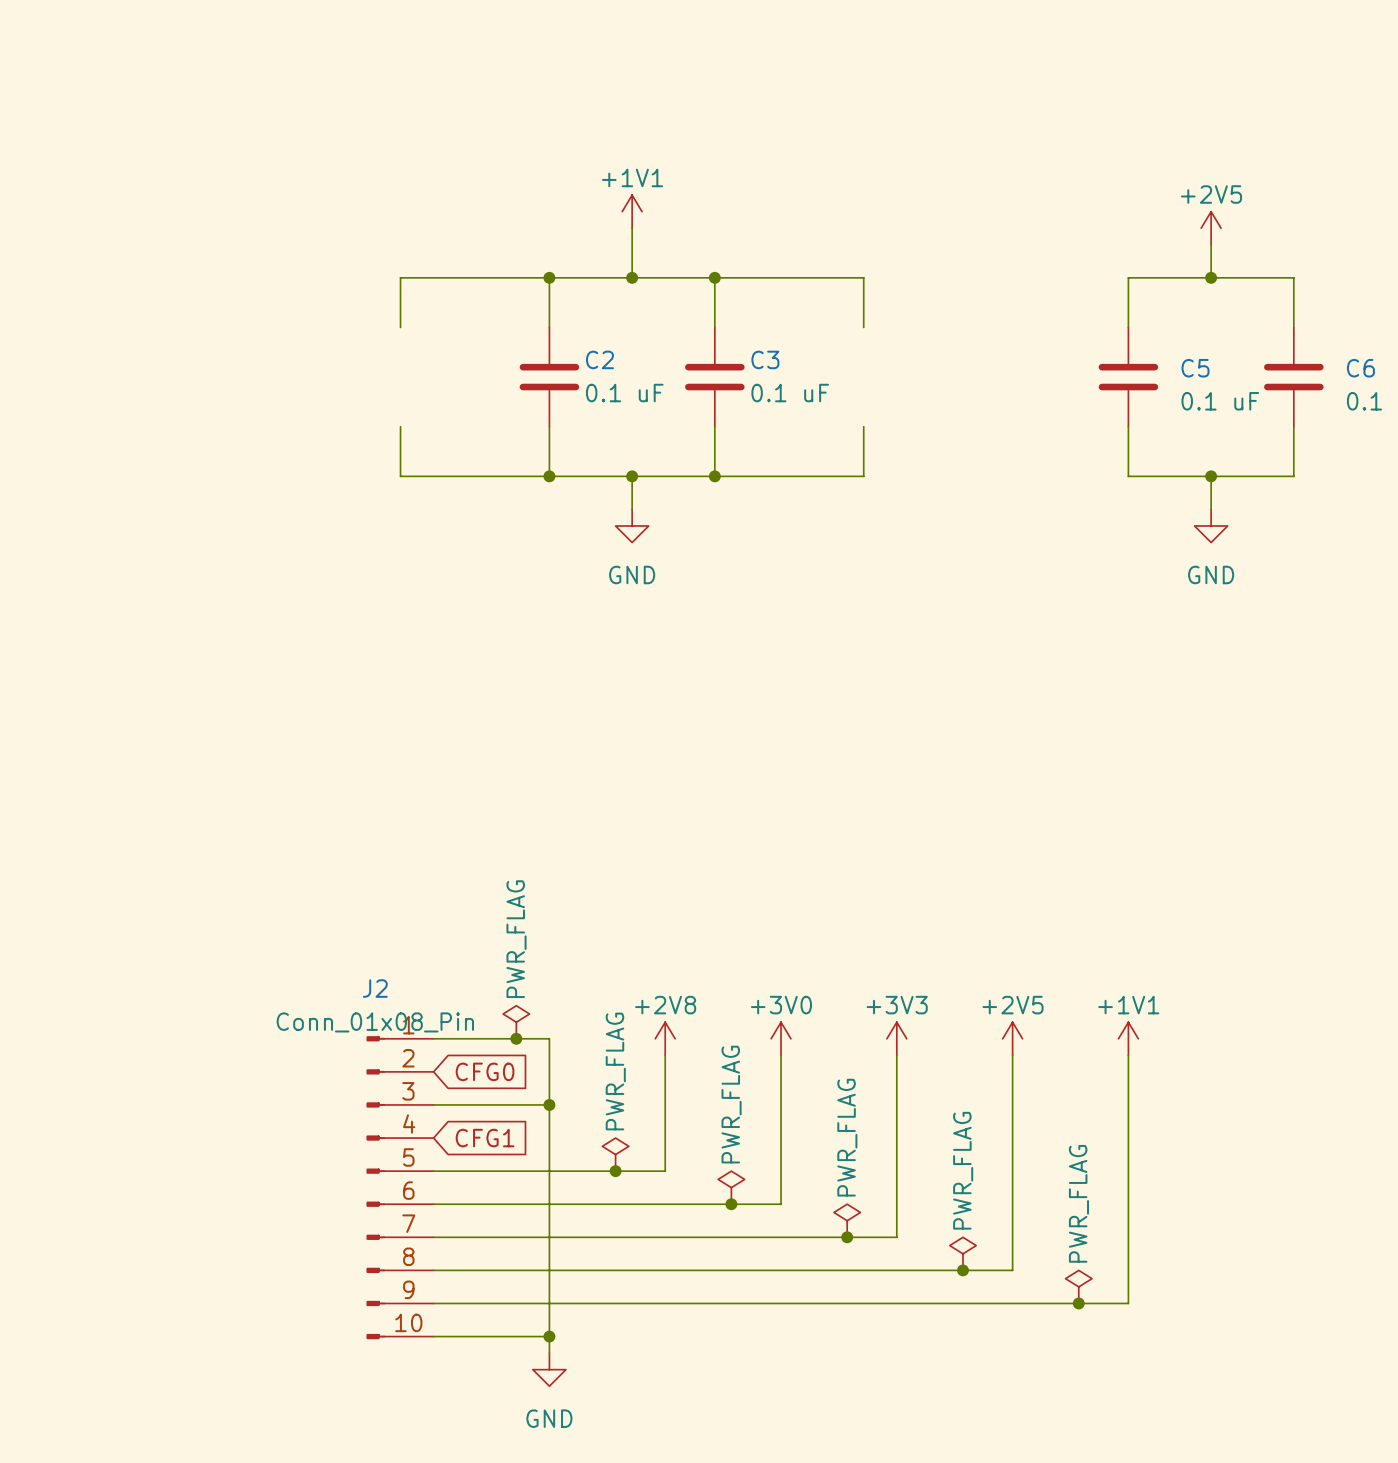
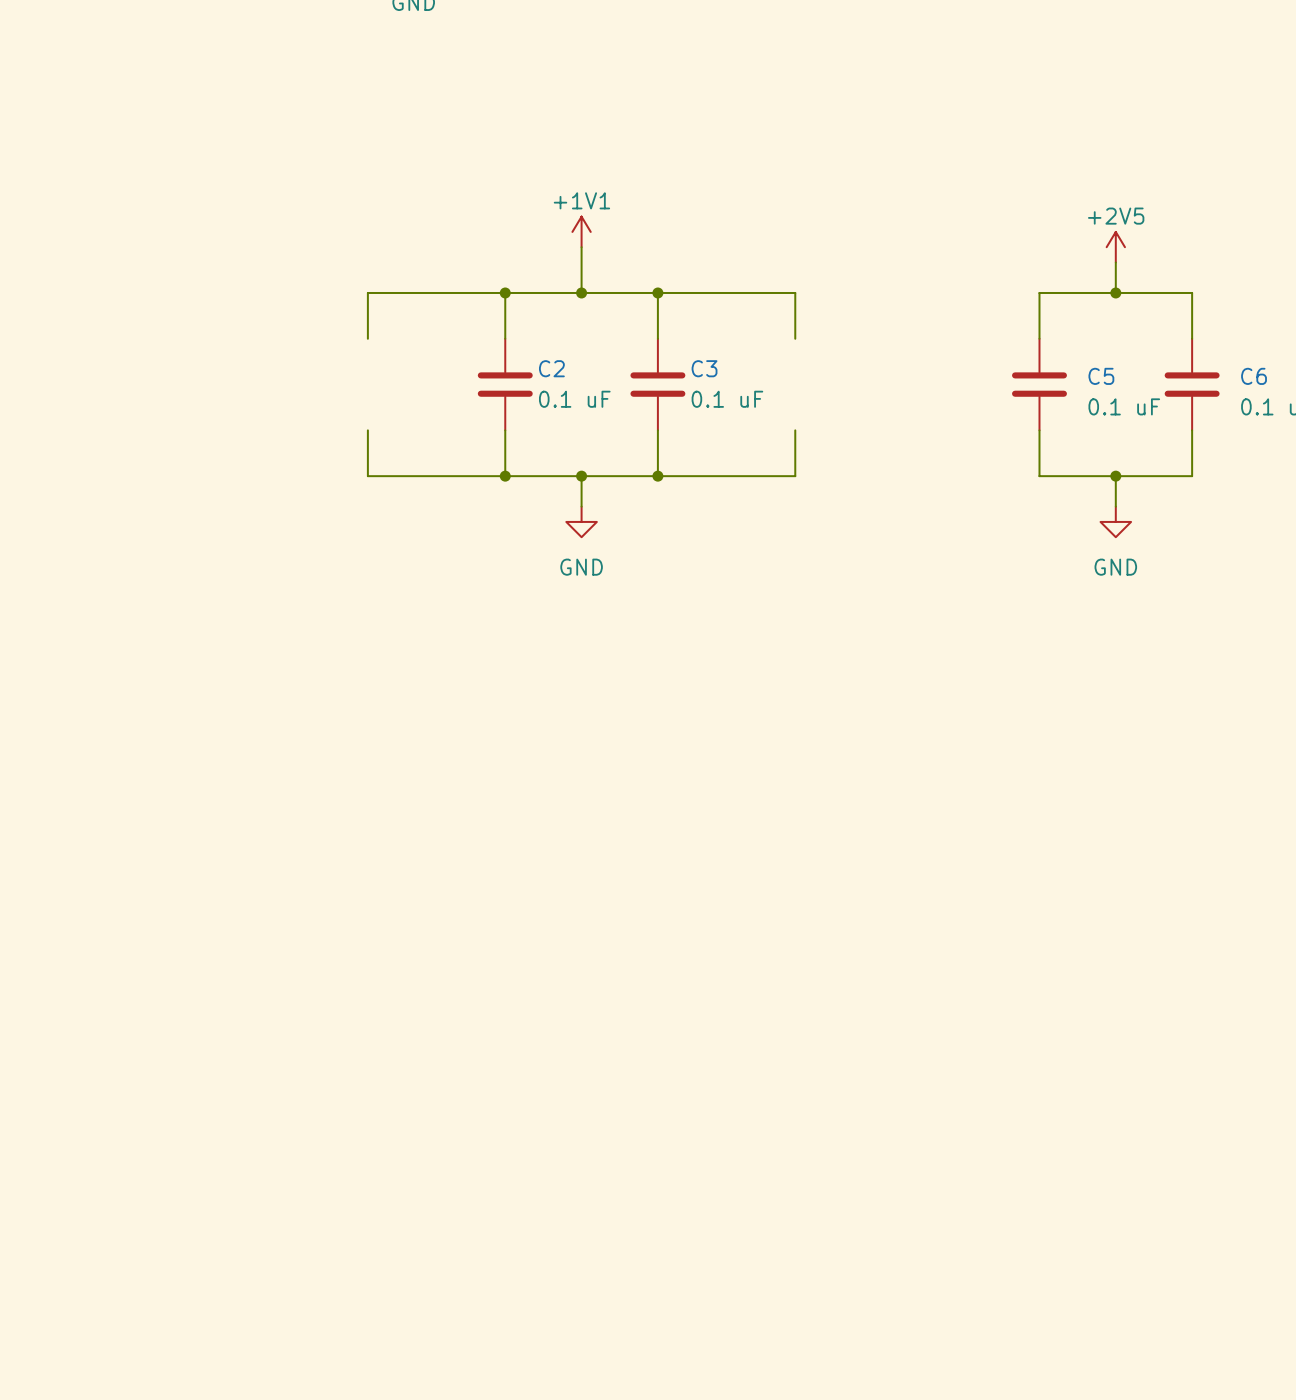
power symbol: PWR_FLAG (516, 1022) -> none
wire: (433, 1038) (549, 1038) (549, 1353) -> none
junction: (516, 1038) -> none
power symbol: +2V8 (665, 1038) -> none
power symbol: +3V0 (781, 1038) -> none
power symbol: +3V3 (896, 1038) -> none
power symbol: +2V5 (1012, 1038) -> none
power symbol: +1V1 (1128, 1038) -> none
wire: (665, 1055) (665, 1171) (433, 1171) -> none
wire: (781, 1055) (781, 1204) (433, 1204) -> none
wire: (896, 1055) (896, 1237) (433, 1237) -> none
wire: (1012, 1055) (1012, 1270) (433, 1270) -> none
wire: (1128, 1055) (1128, 1303) (433, 1303) -> none
global label: CFG0 (485, 1071) -> none
wire: (433, 1104) (549, 1104) -> none
junction: (549, 1104) -> none
global label: CFG1 (485, 1138) -> none
power symbol: PWR_FLAG (615, 1154) -> none
junction: (615, 1171) -> none
J2: Conn_01x08_Pin (400, 1187) -> none
power symbol: PWR_FLAG (731, 1187) -> none
junction: (731, 1204) -> none
power symbol: PWR_FLAG (847, 1220) -> none
junction: (847, 1237) -> none
power symbol: PWR_FLAG (962, 1253) -> none
junction: (962, 1270) -> none
power symbol: PWR_FLAG (1078, 1286) -> none
junction: (1078, 1303) -> none
wire: (433, 1336) (549, 1336) -> none
junction: (549, 1336) -> none
power symbol: GND (549, 1369) -> none

